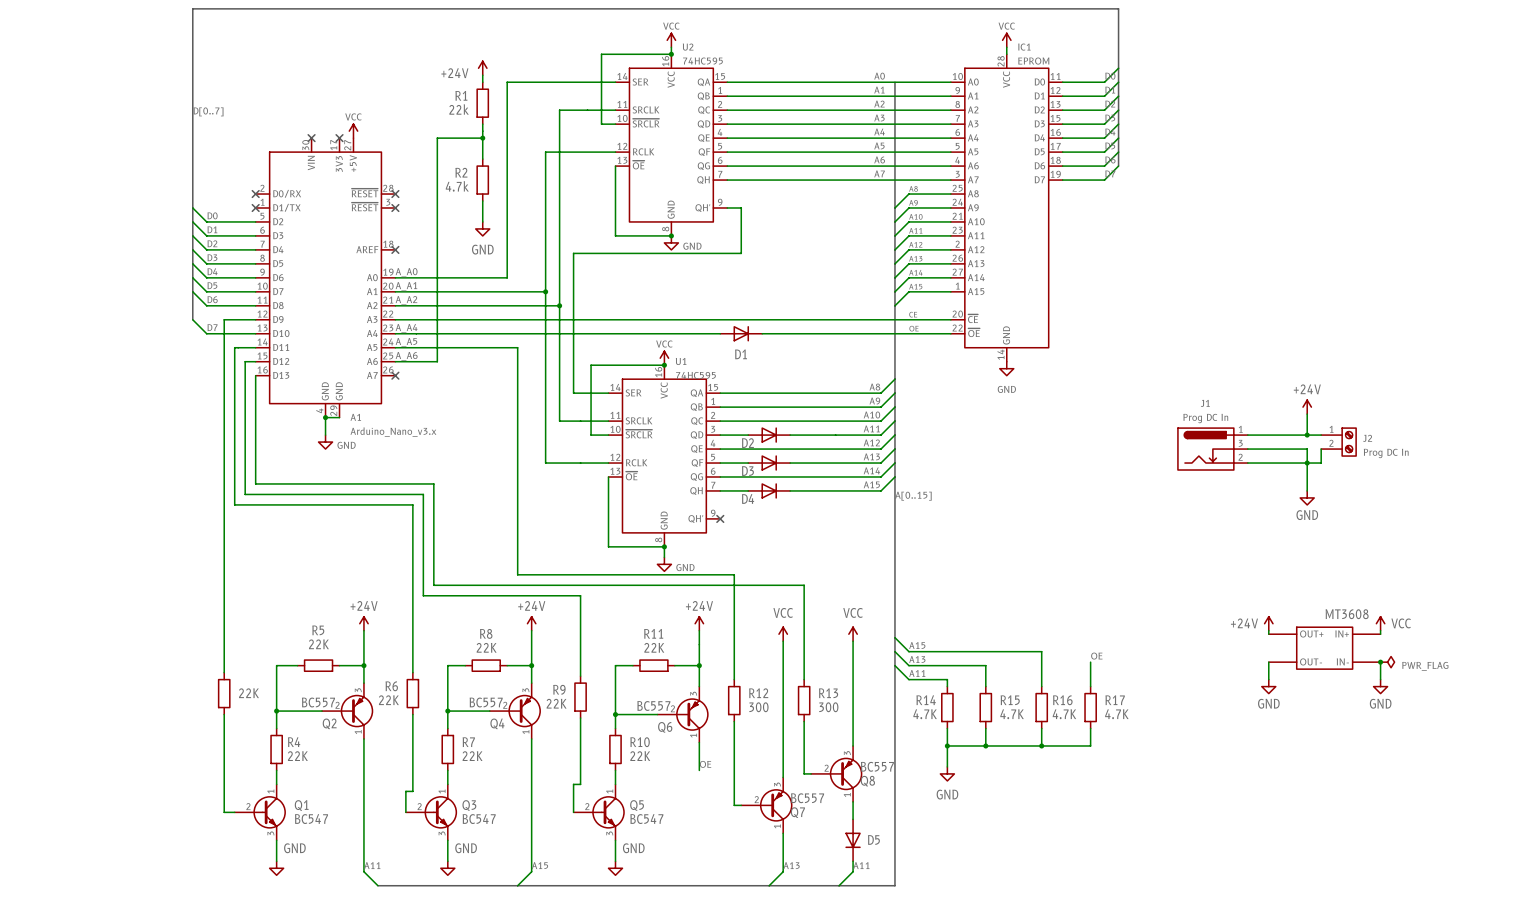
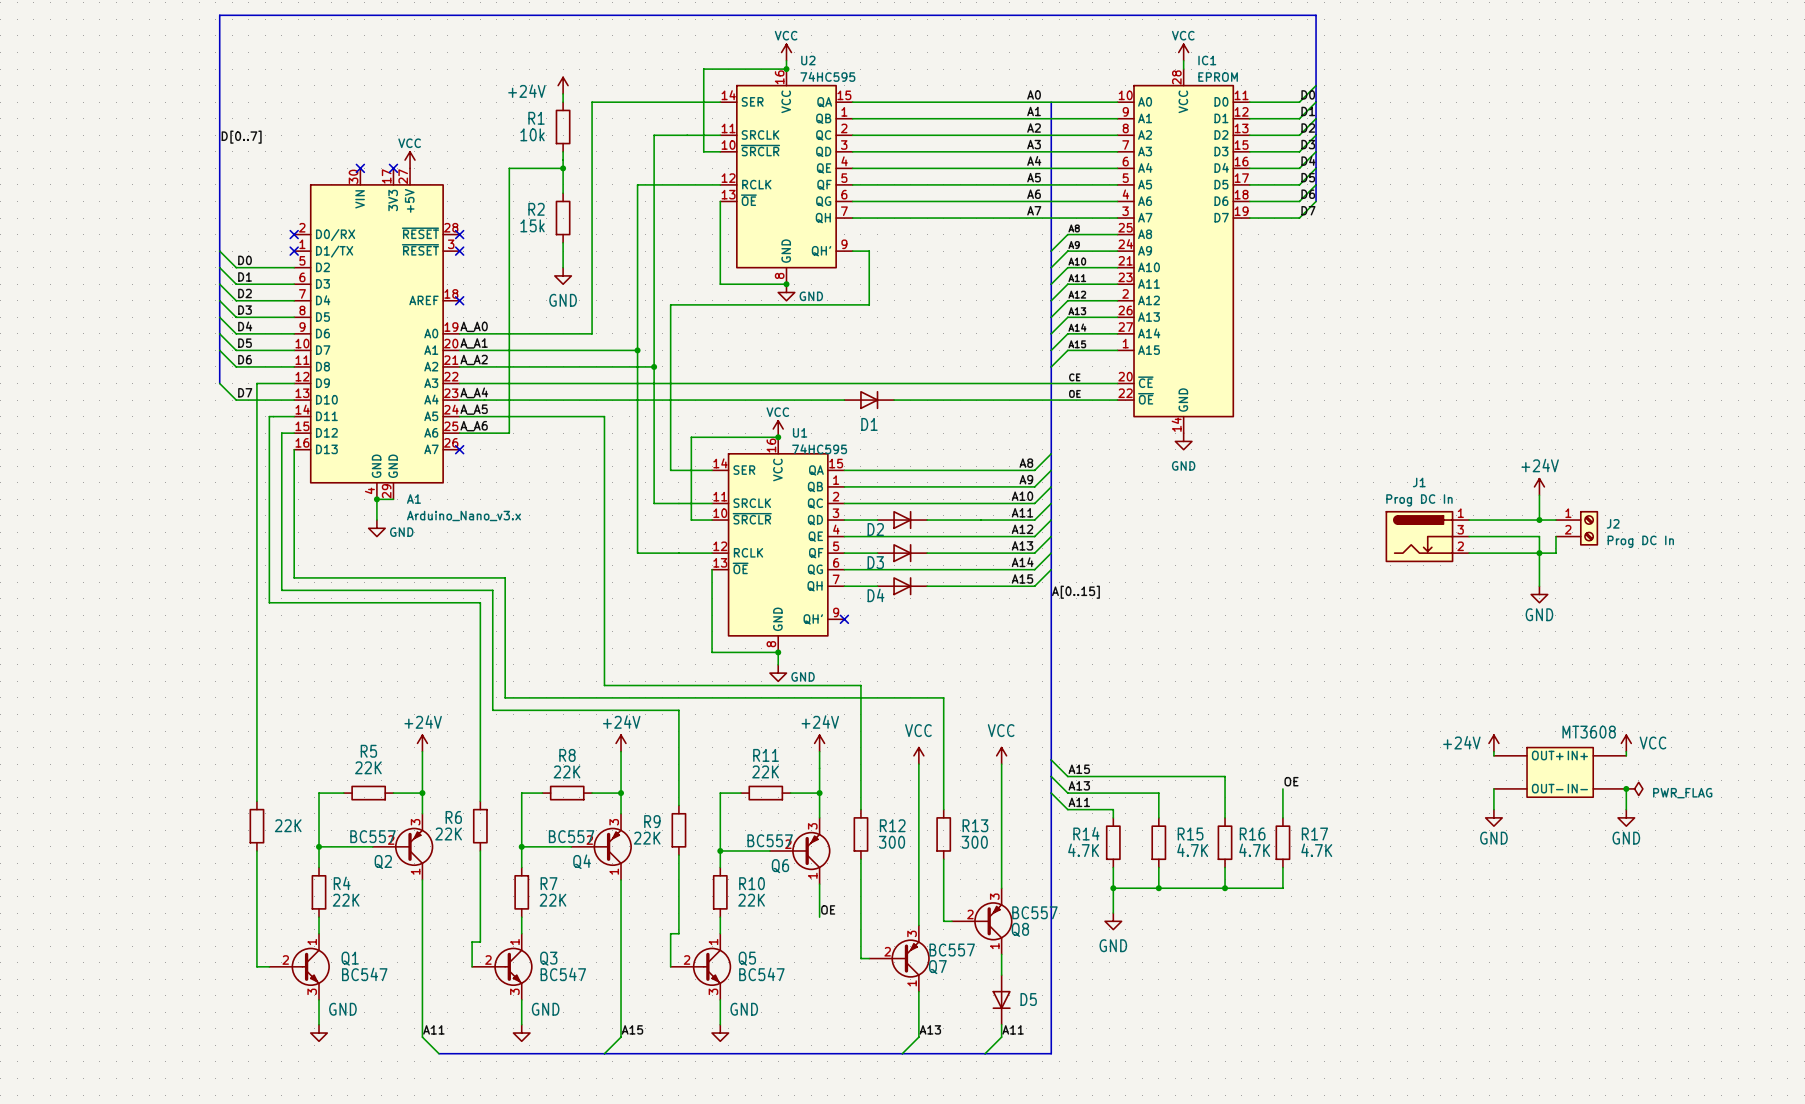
R1 value: 22k (459, 109) -> 10k (532, 134)
R2 value: 4.7k (457, 186) -> 15k (532, 225)

